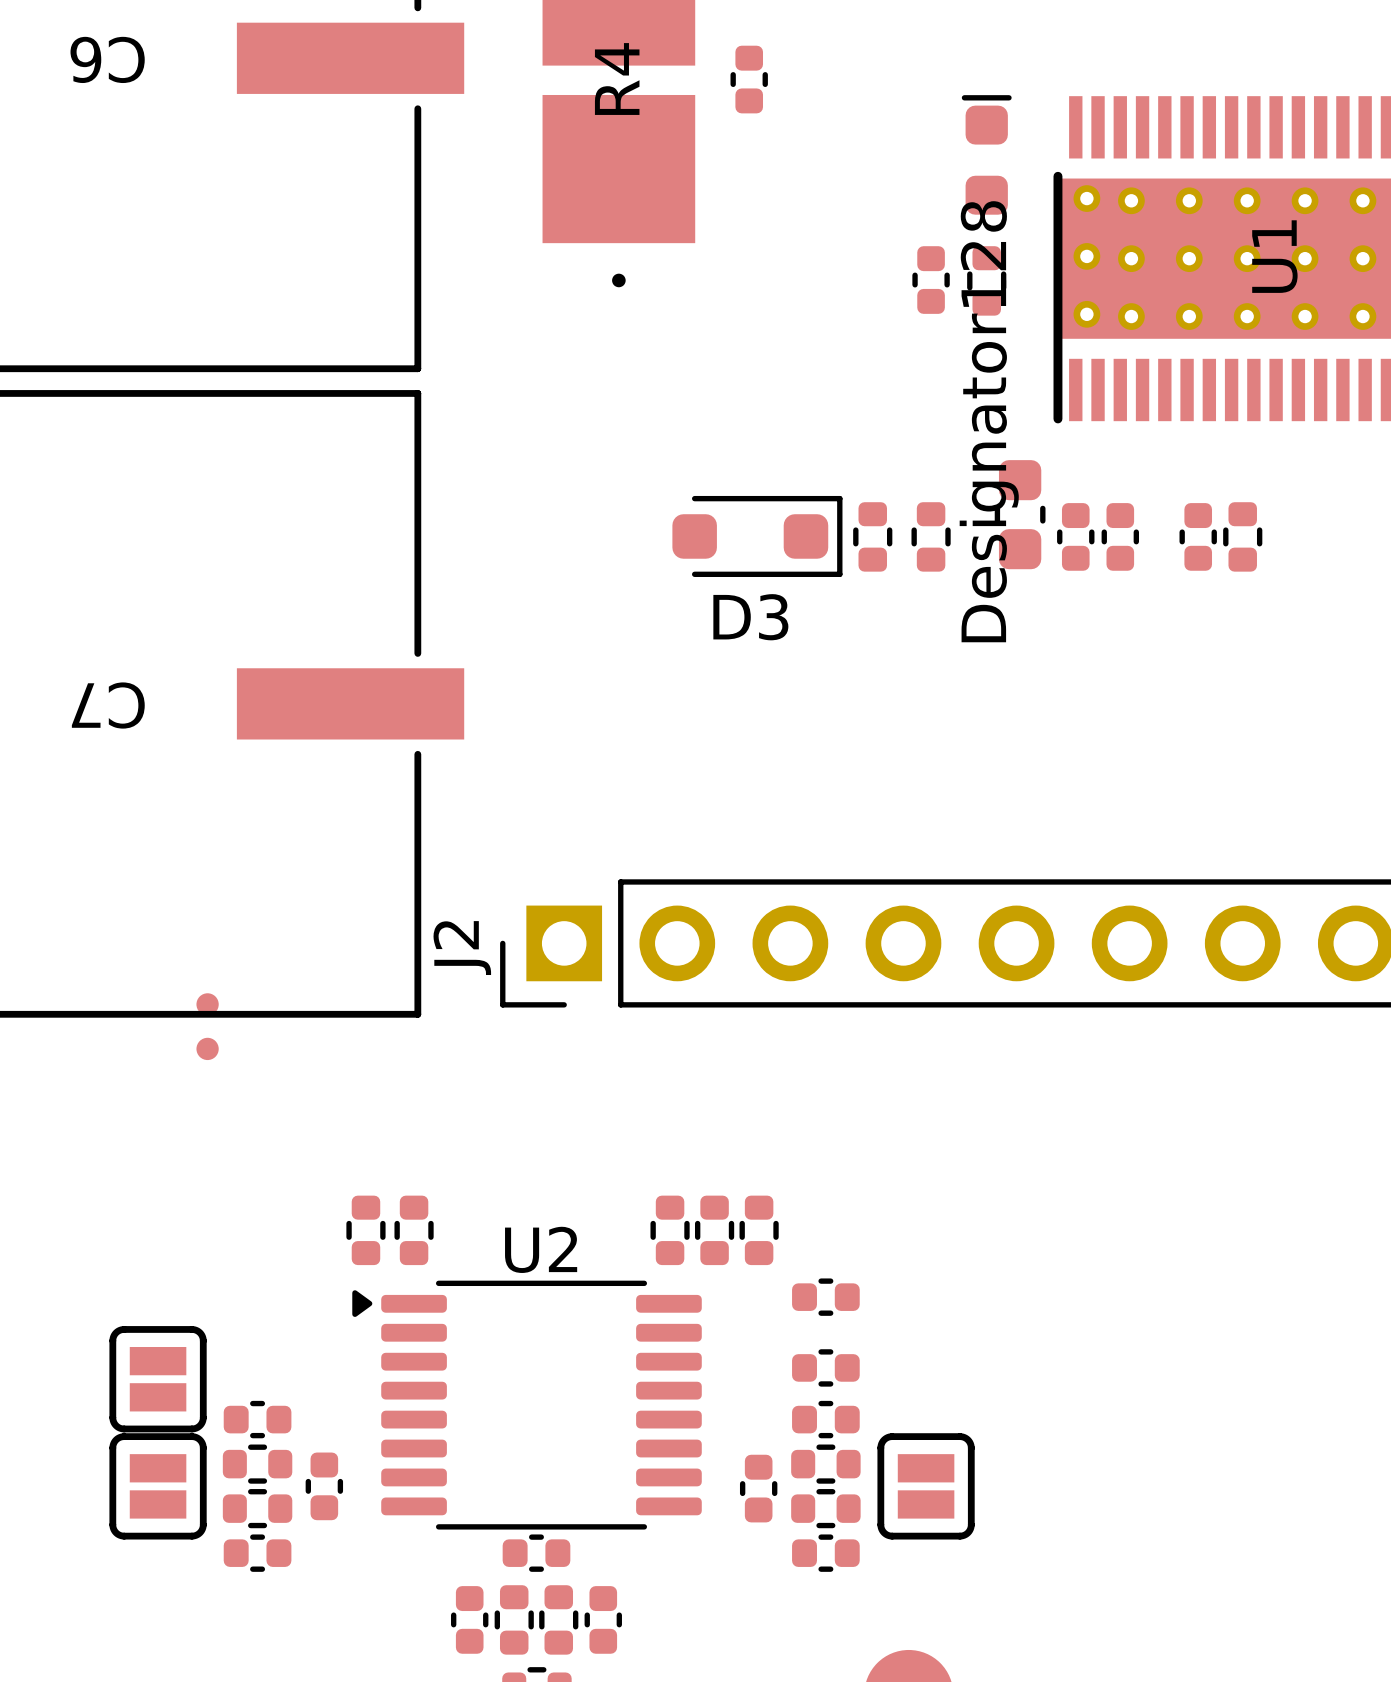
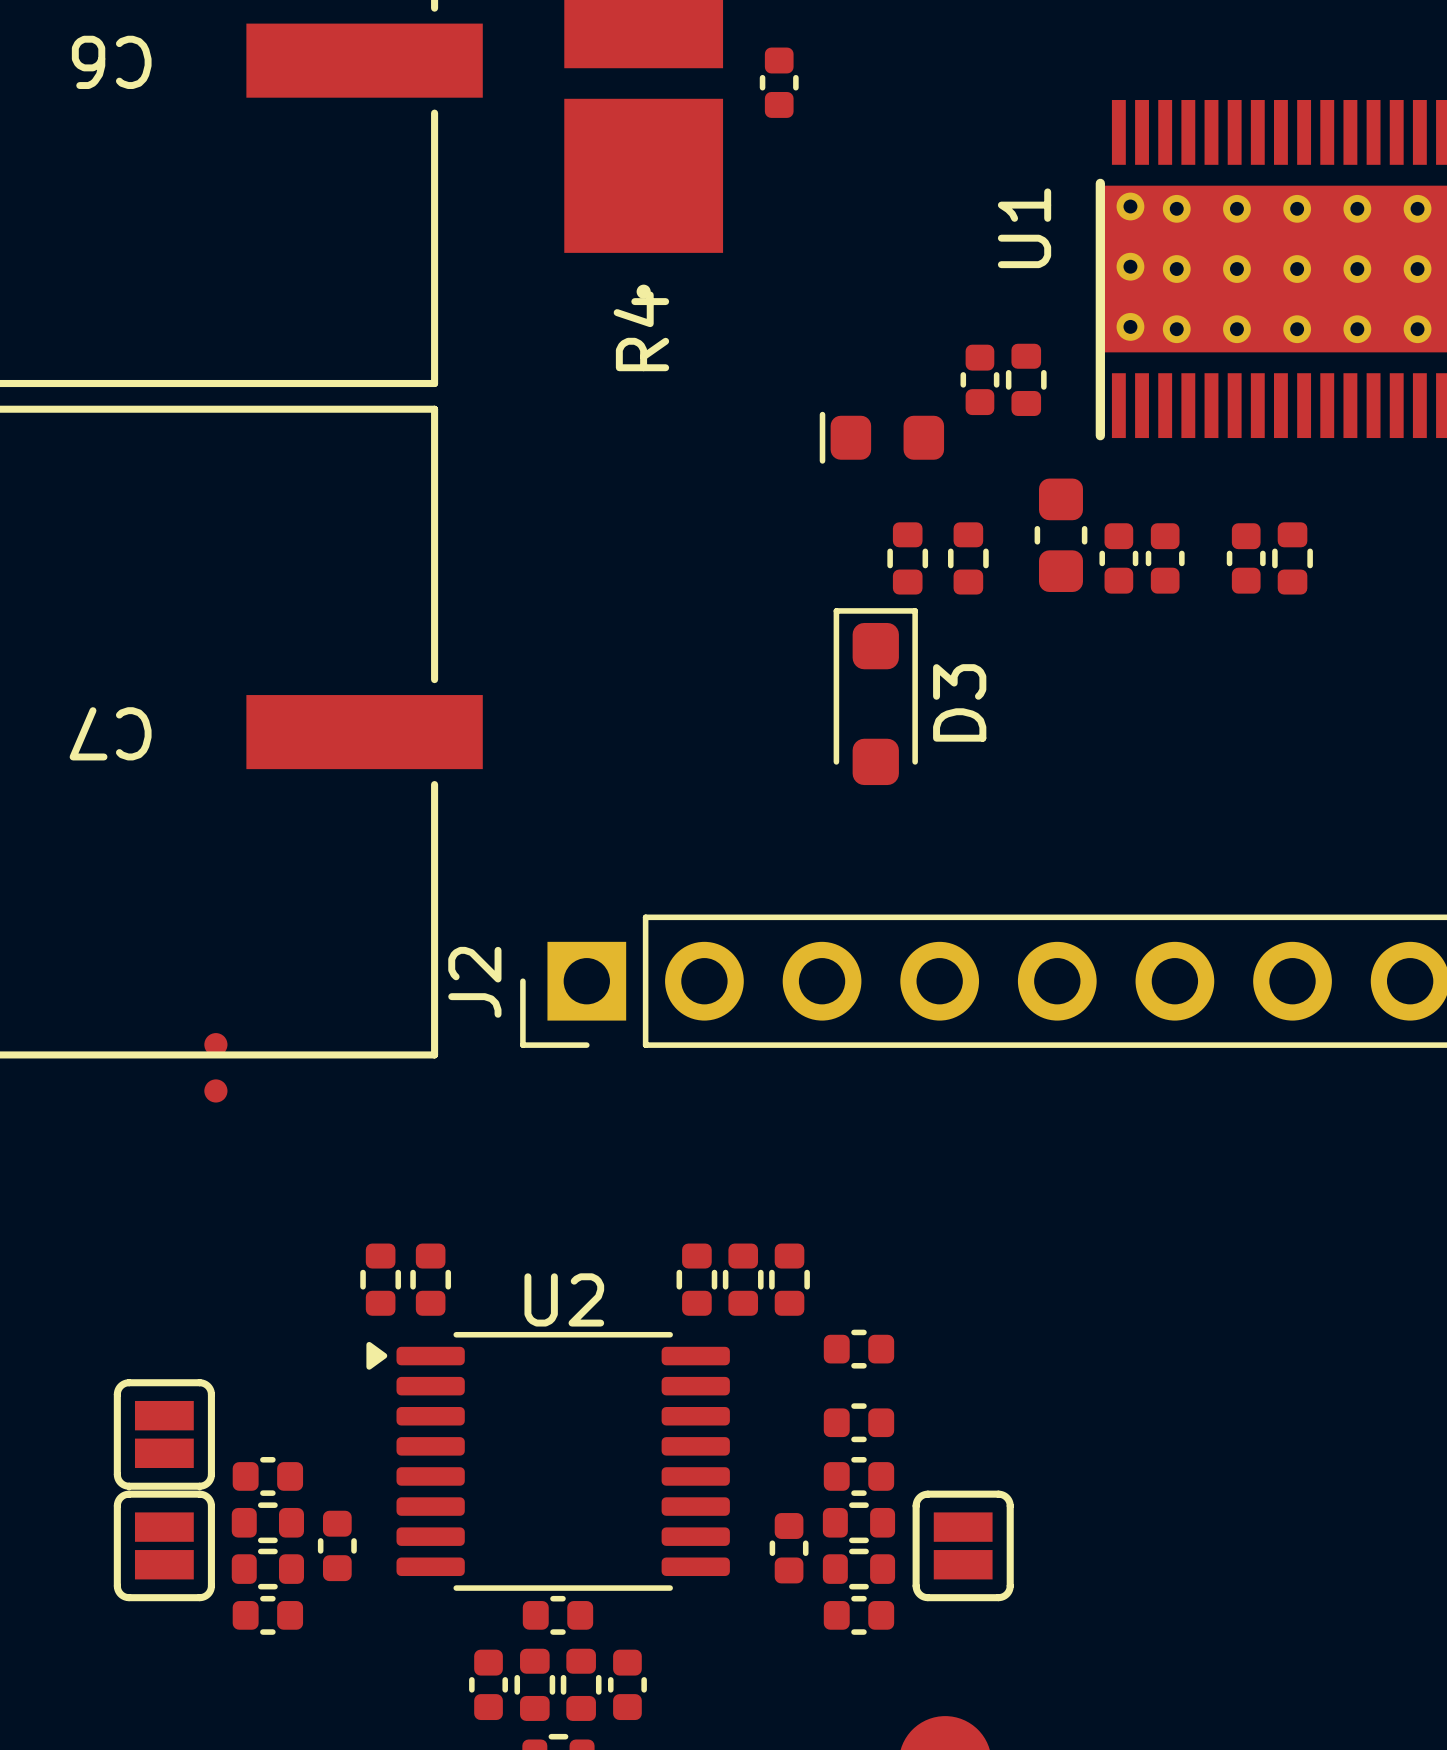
R4 name position: R4 (617, 79) -> R4 (641, 331)
part rotation: 0° (986, 154) -> 90° counterclockwise (881, 437)
part position: (986, 154) -> (881, 437)
U1 name position: U1 (1274, 256) -> U1 (1024, 228)
part position: (931, 280) -> (979, 379)
part position: (986, 280) -> (1026, 379)
U1 text: Designator128 (989, 421) -> none
D3 rotation: 0° (757, 536) -> 90° counterclockwise (875, 696)
D3 position: (757, 536) -> (875, 696)

